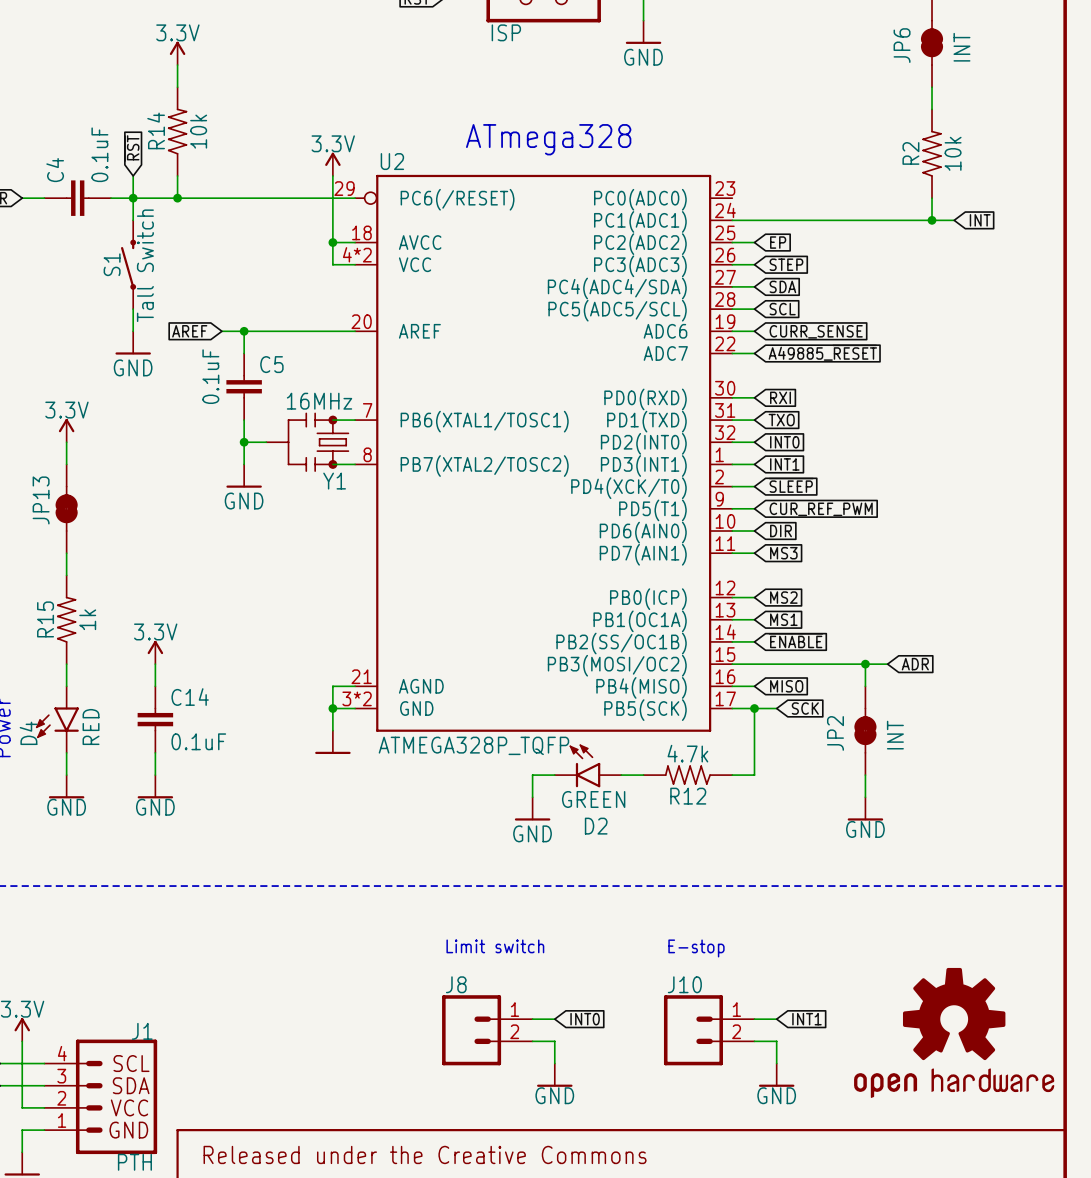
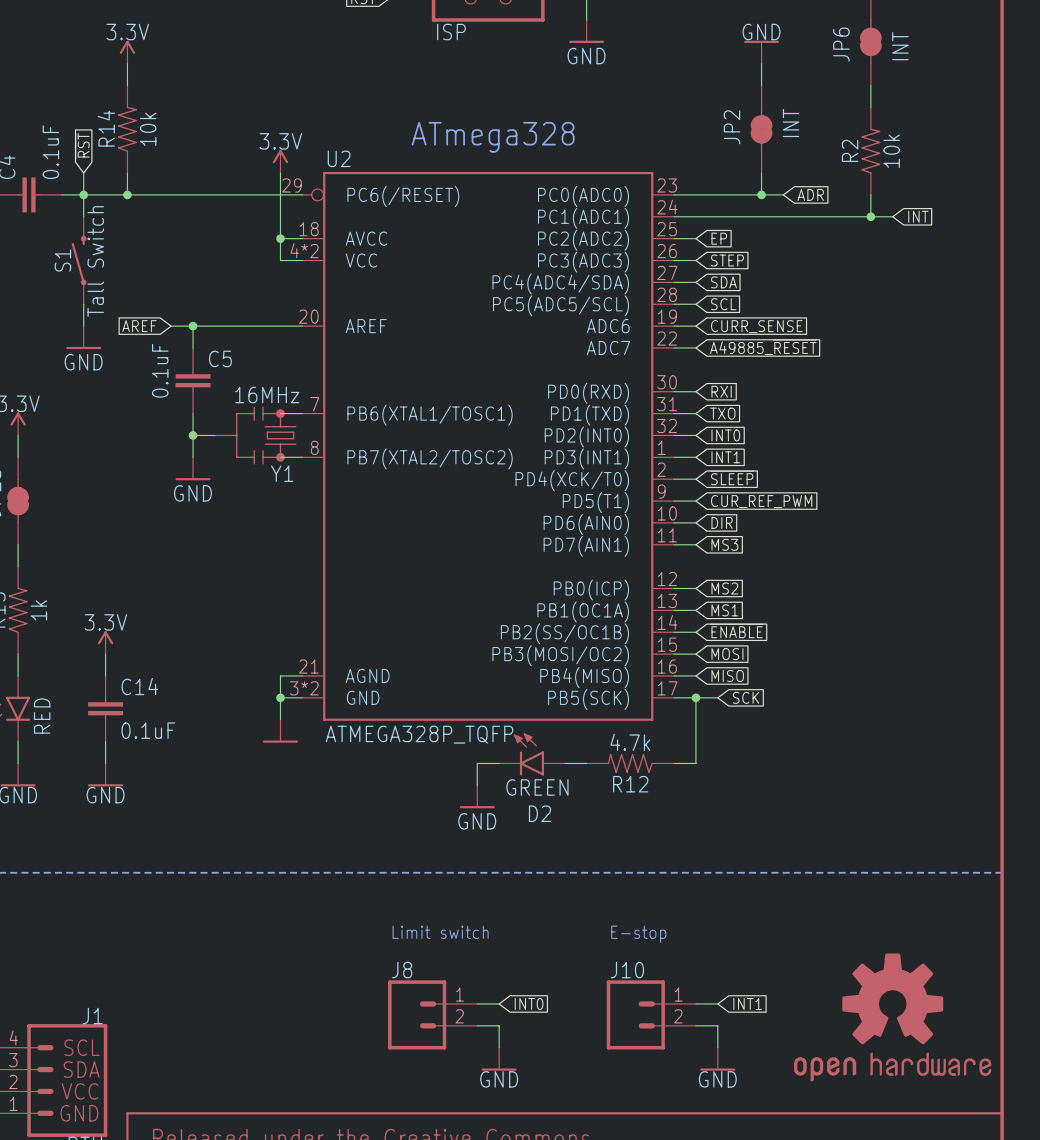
power symbol: none -> GND (761, 52)
wire: none -> (761, 63) (761, 85)
wire: none -> (761, 173) (761, 194)
wire: none -> (674, 194) (783, 194)
junction: none -> (761, 194)
global label: none -> ADR (810, 194)
wire: (754, 664) (887, 664) -> none
global label: none -> MOSI (727, 654)
wire: (865, 664) (865, 686) -> none
junction: (865, 664) -> none
global label: ADR (915, 664) -> none
JP2 rotation: 0° (865, 730) -> 180° (761, 129)
JP2 position: (865, 730) -> (761, 129)
wire: (865, 775) (865, 797) -> none
power symbol: GND (865, 808) -> none

